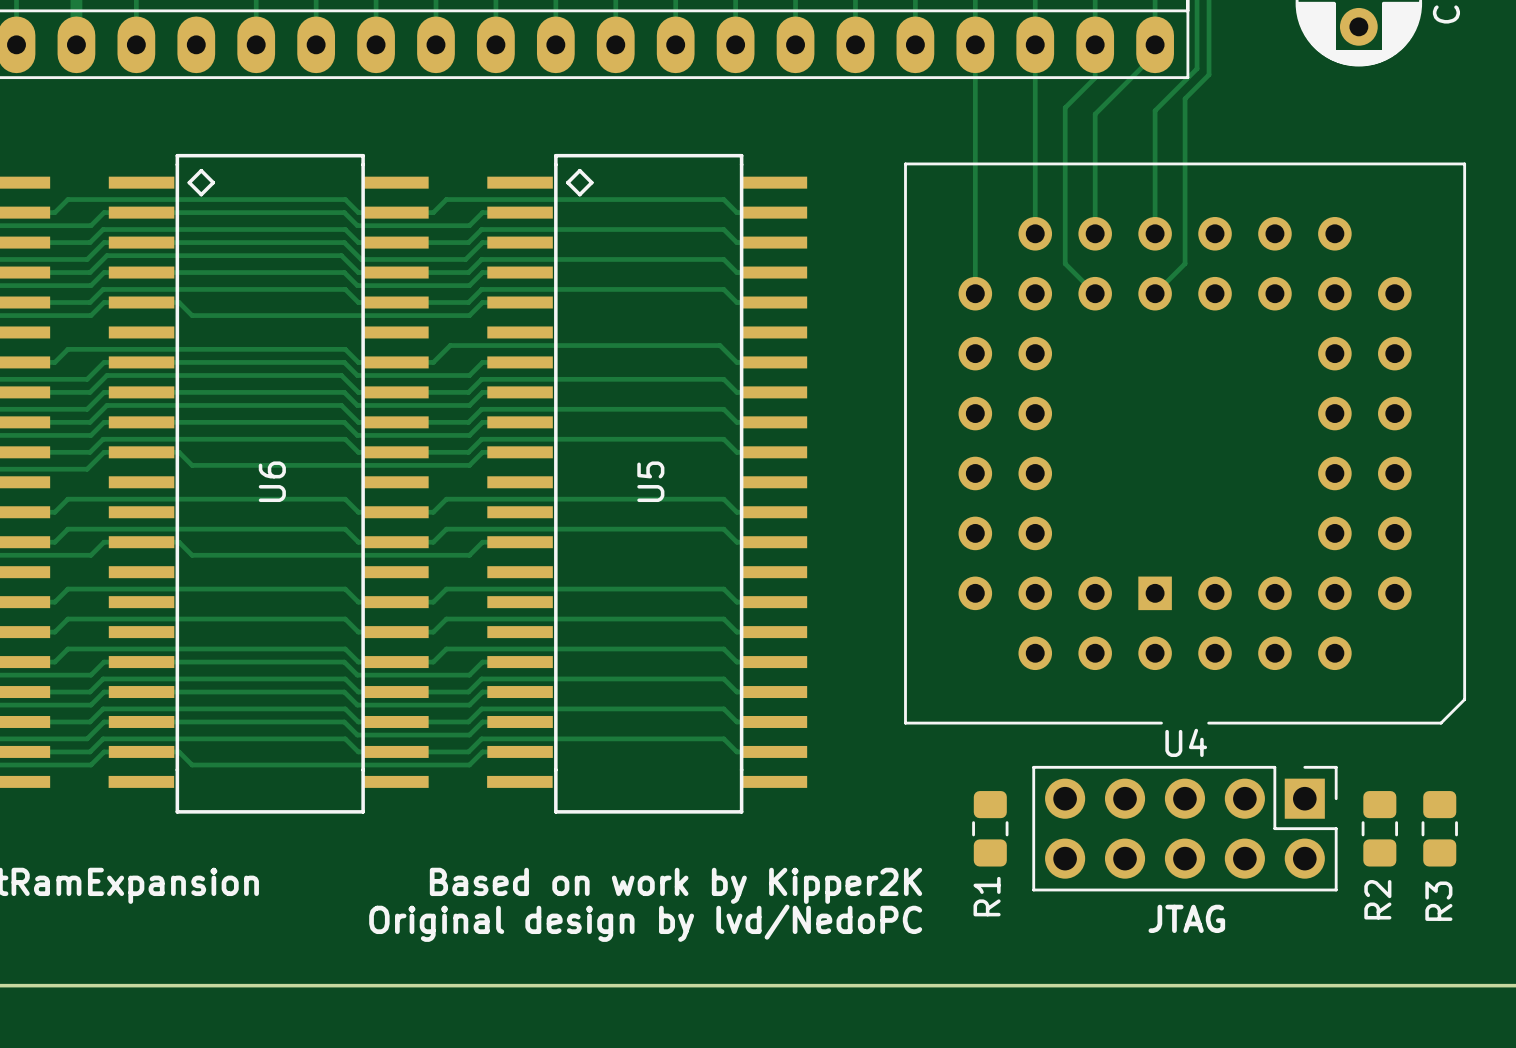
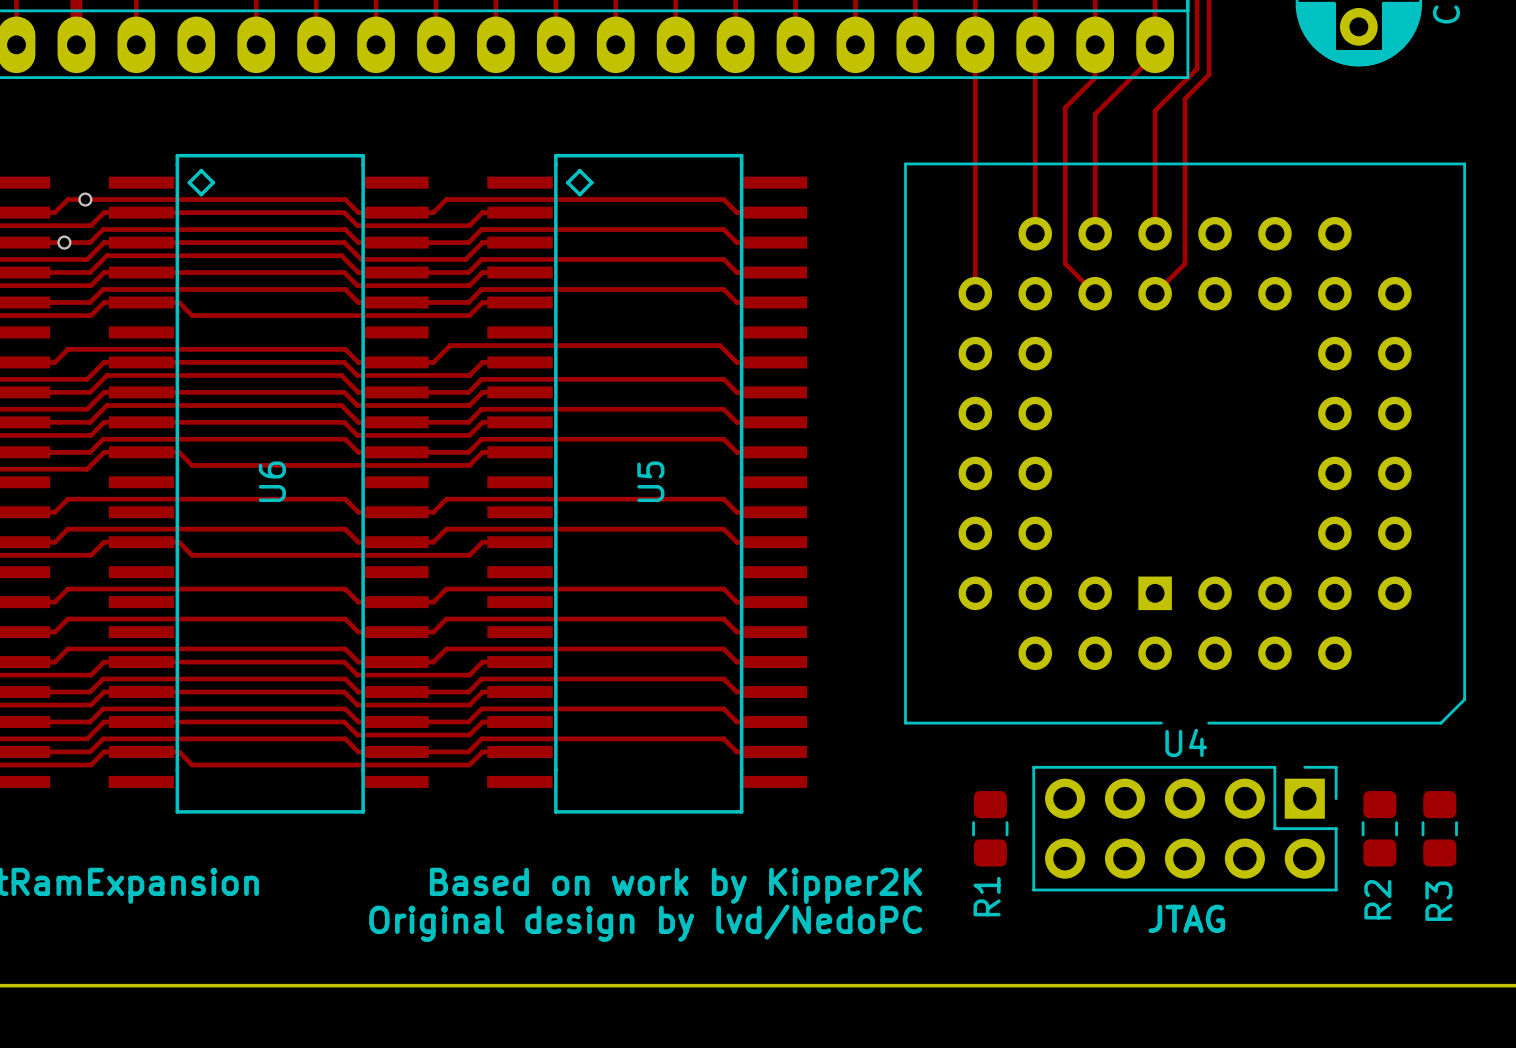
via: none -> (85, 199)
via: none -> (64, 242)

